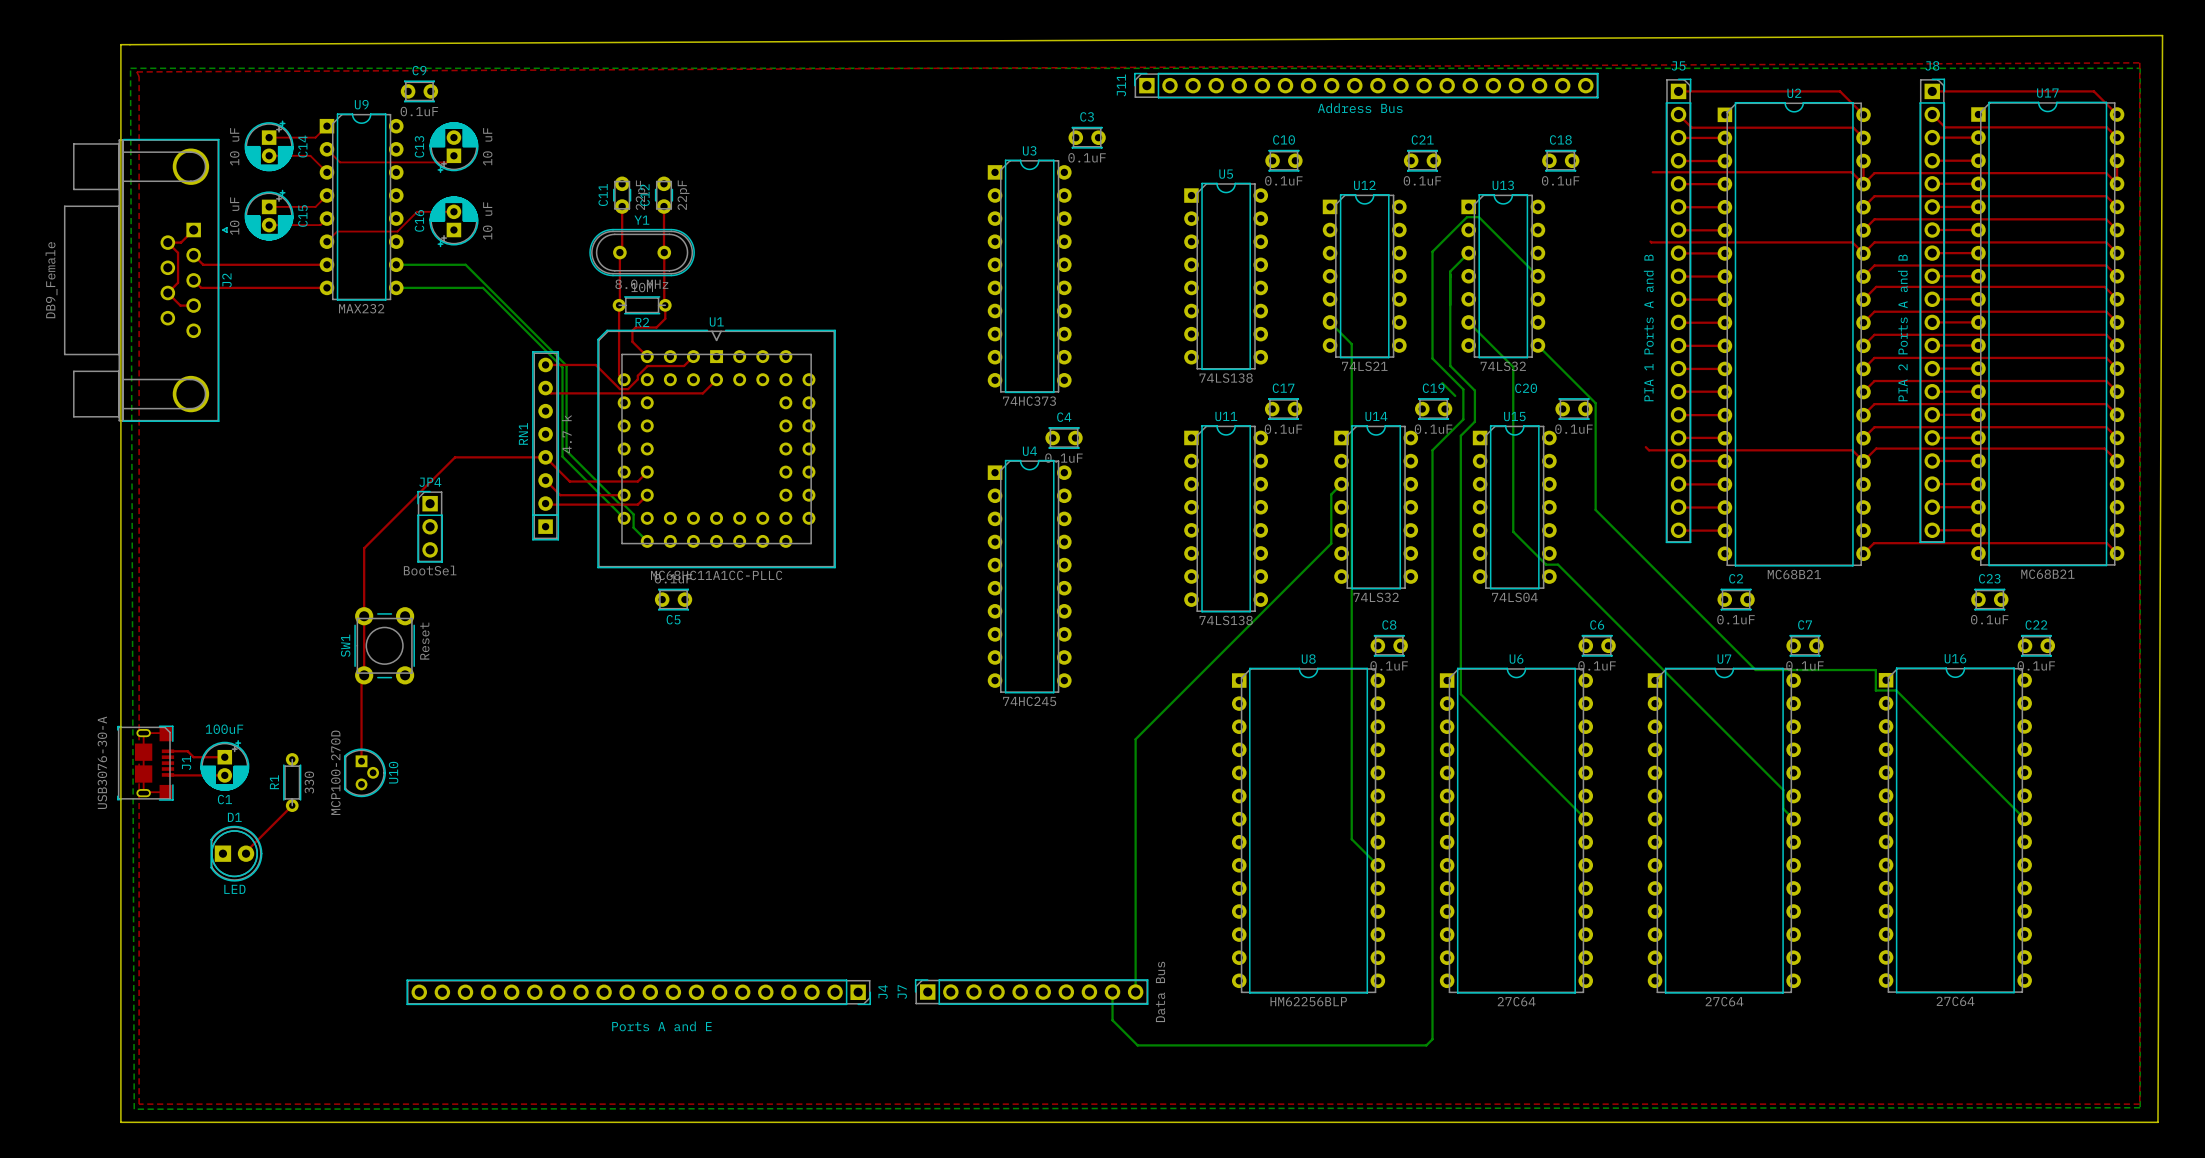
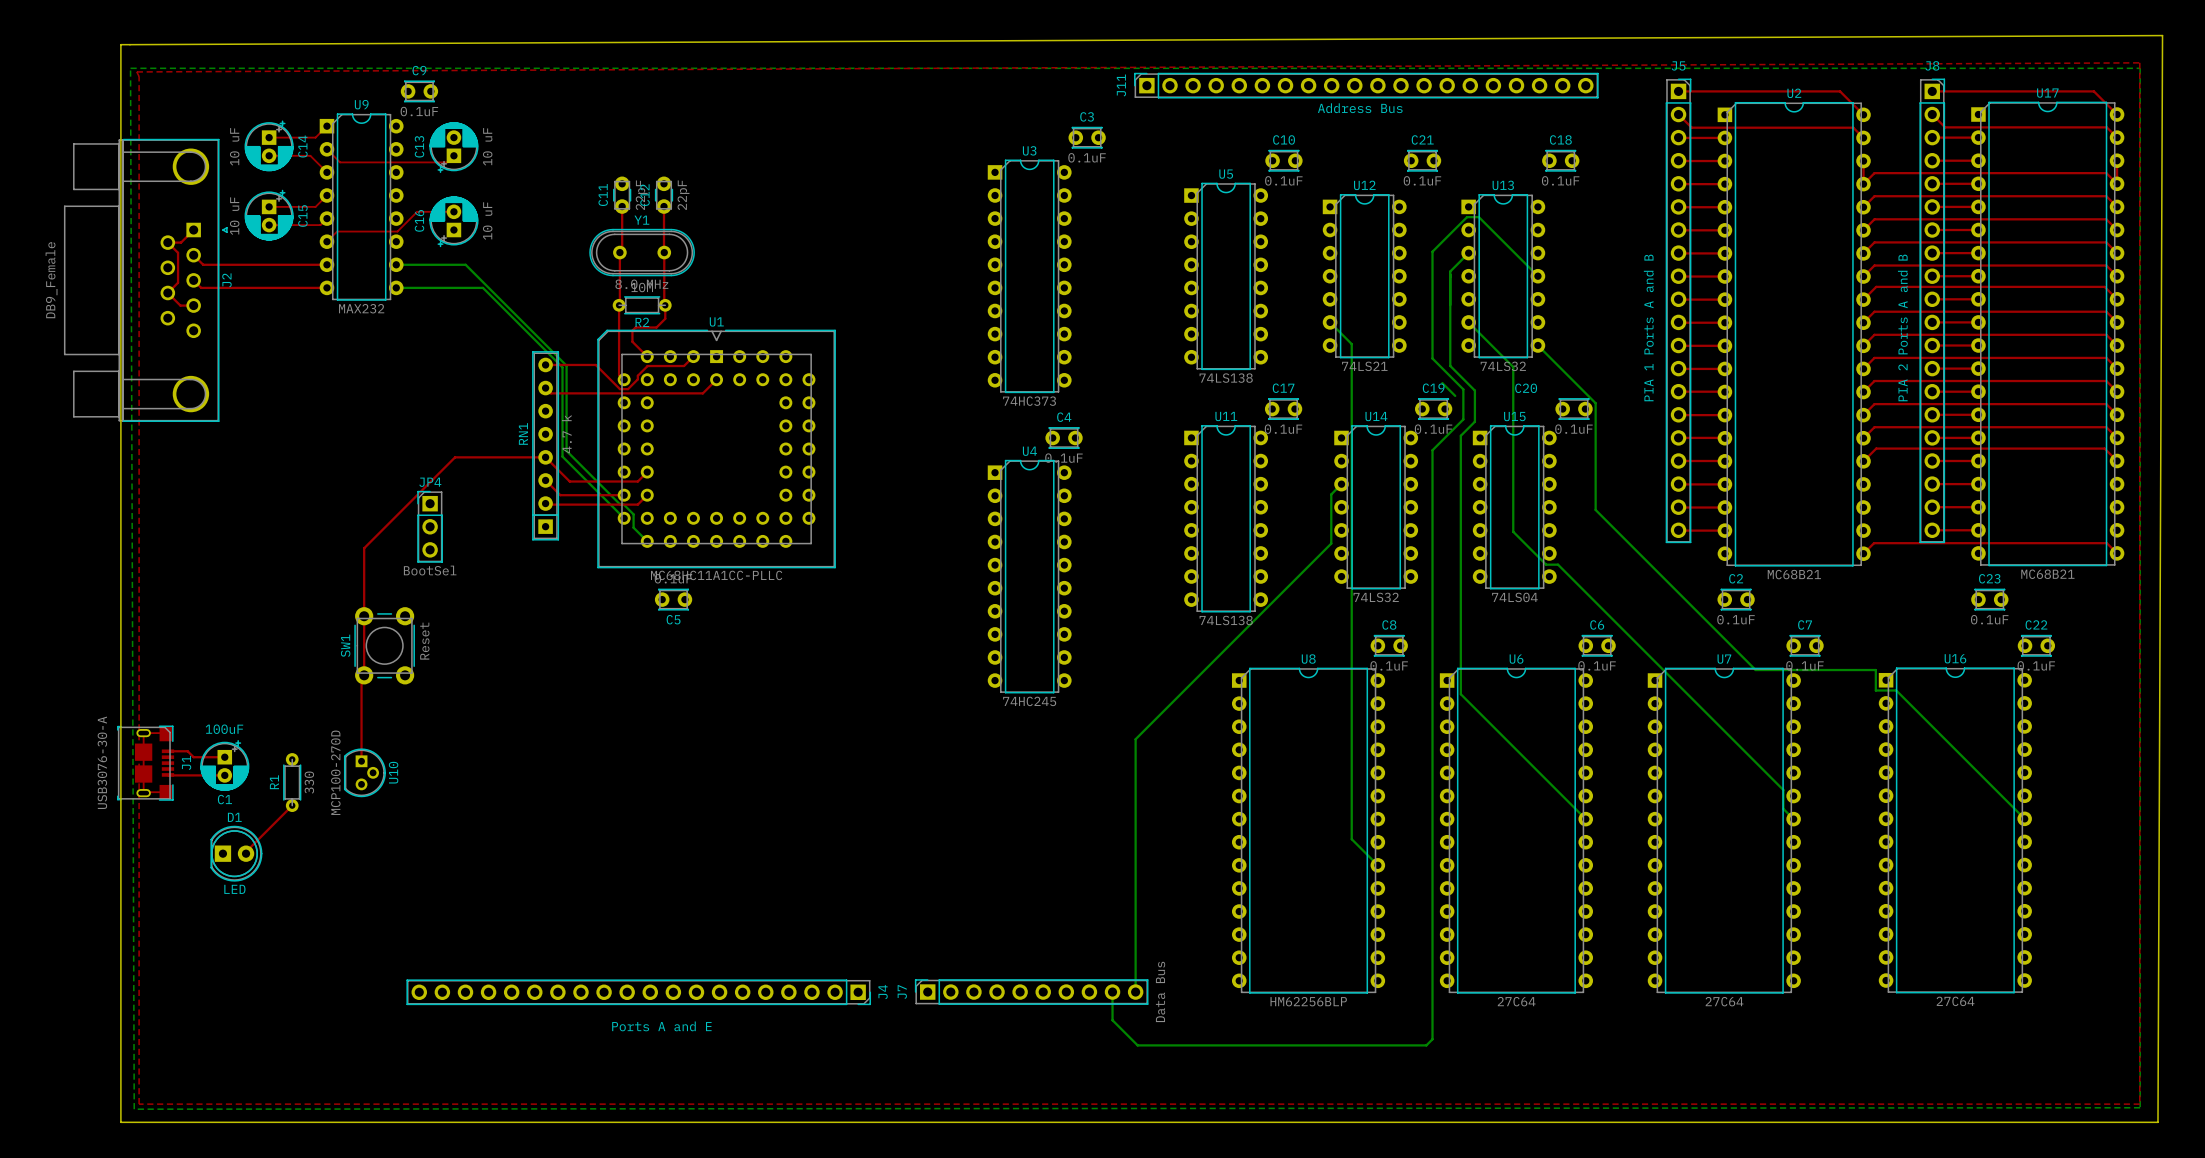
top track: (1652, 172) (1851, 172) (1863, 184) -> none
top track: (1650, 241) (1852, 242) (1863, 253) -> none
top track: (1645, 447) (1649, 450) (1852, 450) (1863, 461) -> none

